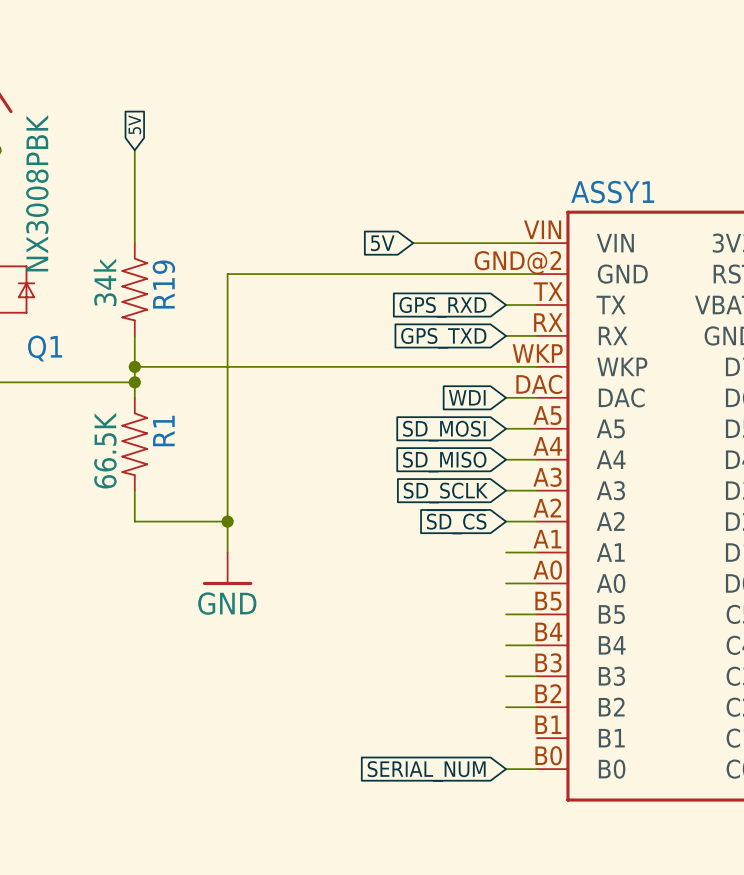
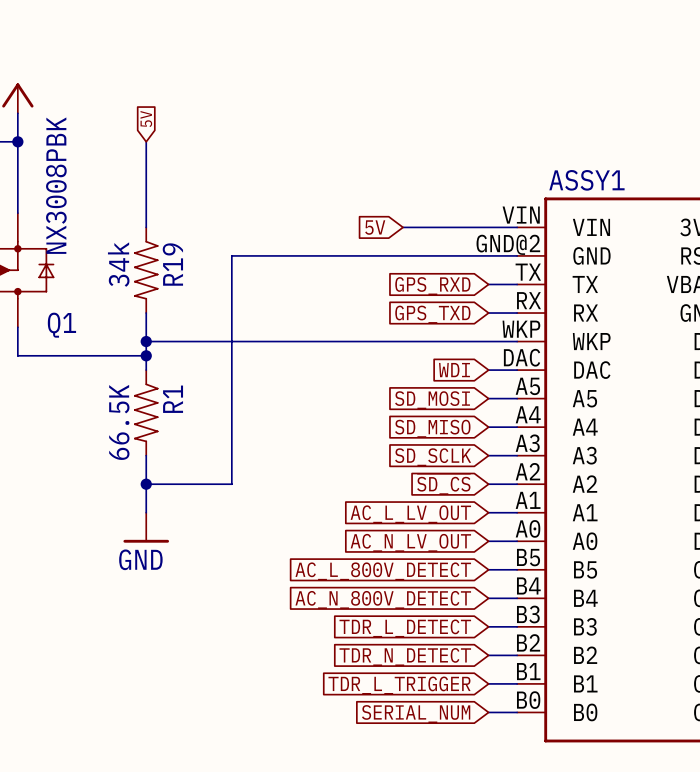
junction: none -> (146, 484)
wire: (227, 521) (227, 552) -> (146, 484) (146, 512)
junction: (227, 521) -> none
global label: none -> AC_L_LV_OUT (410, 514)
power symbol position: GND (227, 568) -> GND (146, 527)
global label: none -> AC_N_LV_OUT (410, 542)
global label: none -> AC_L_800V_DETECT (383, 571)
global label: none -> AC_N_800V_DETECT (383, 599)
global label: none -> TDR_L_DETECT (405, 628)
global label: none -> TDR_N_DETECT (405, 657)
wire: none -> (488, 683) (517, 683)
global label: none -> TDR_L_TRIGGER (399, 685)

